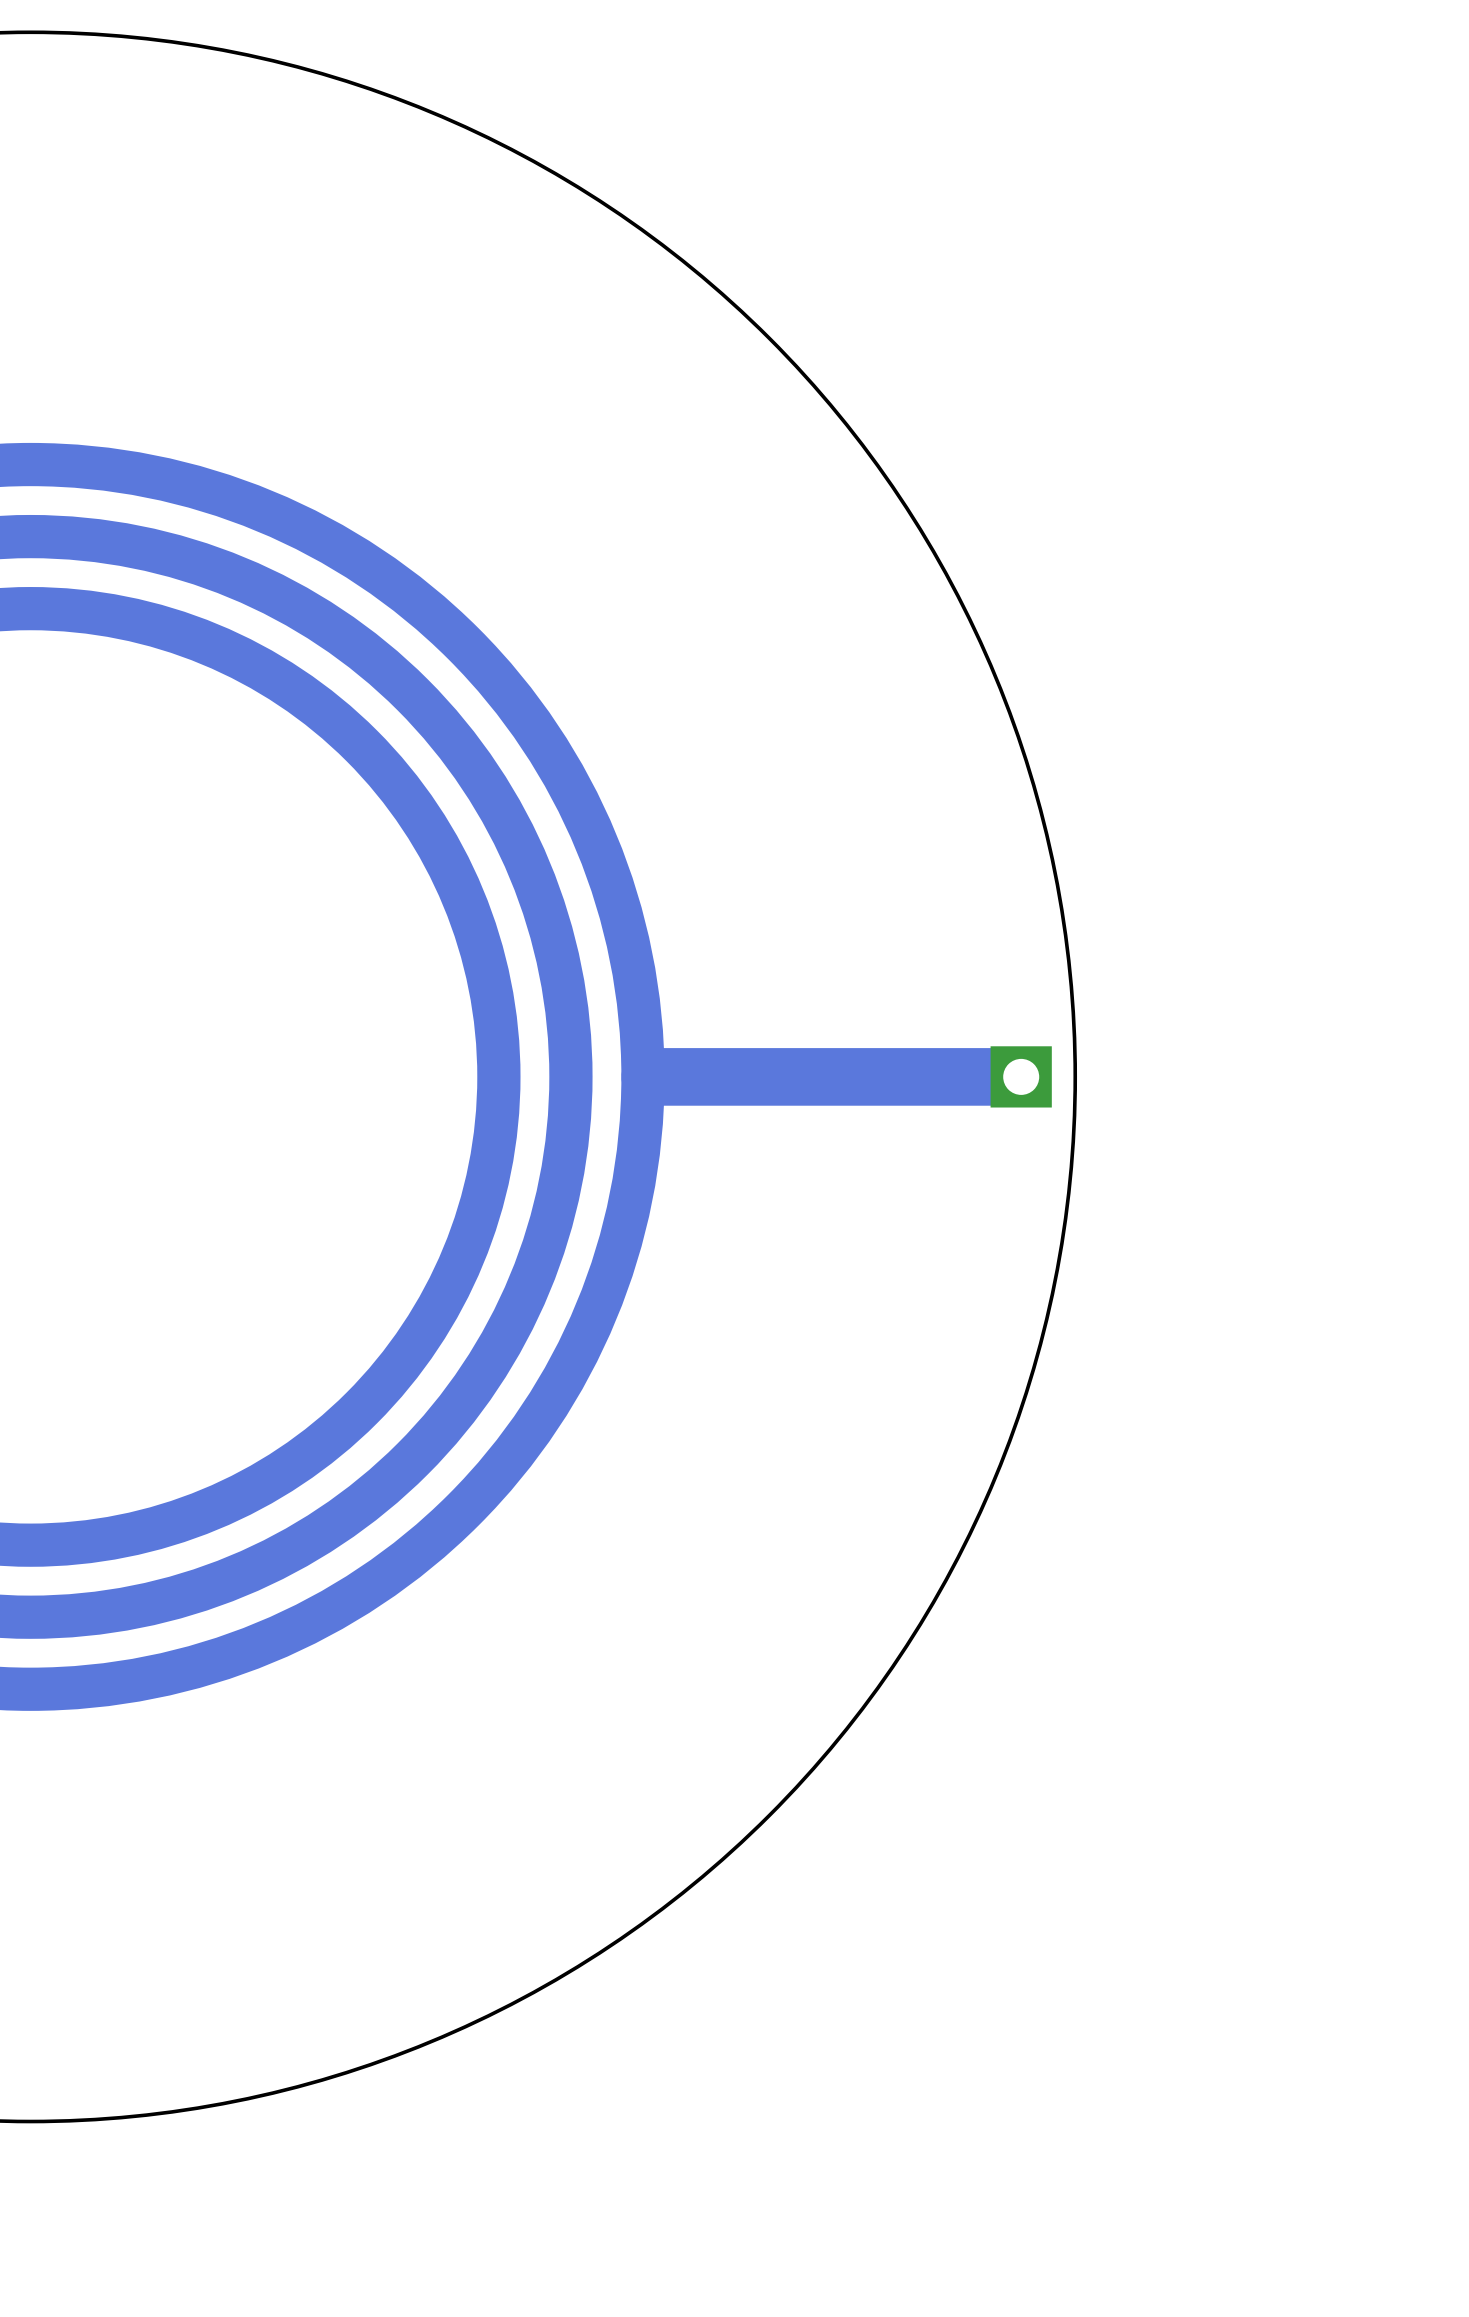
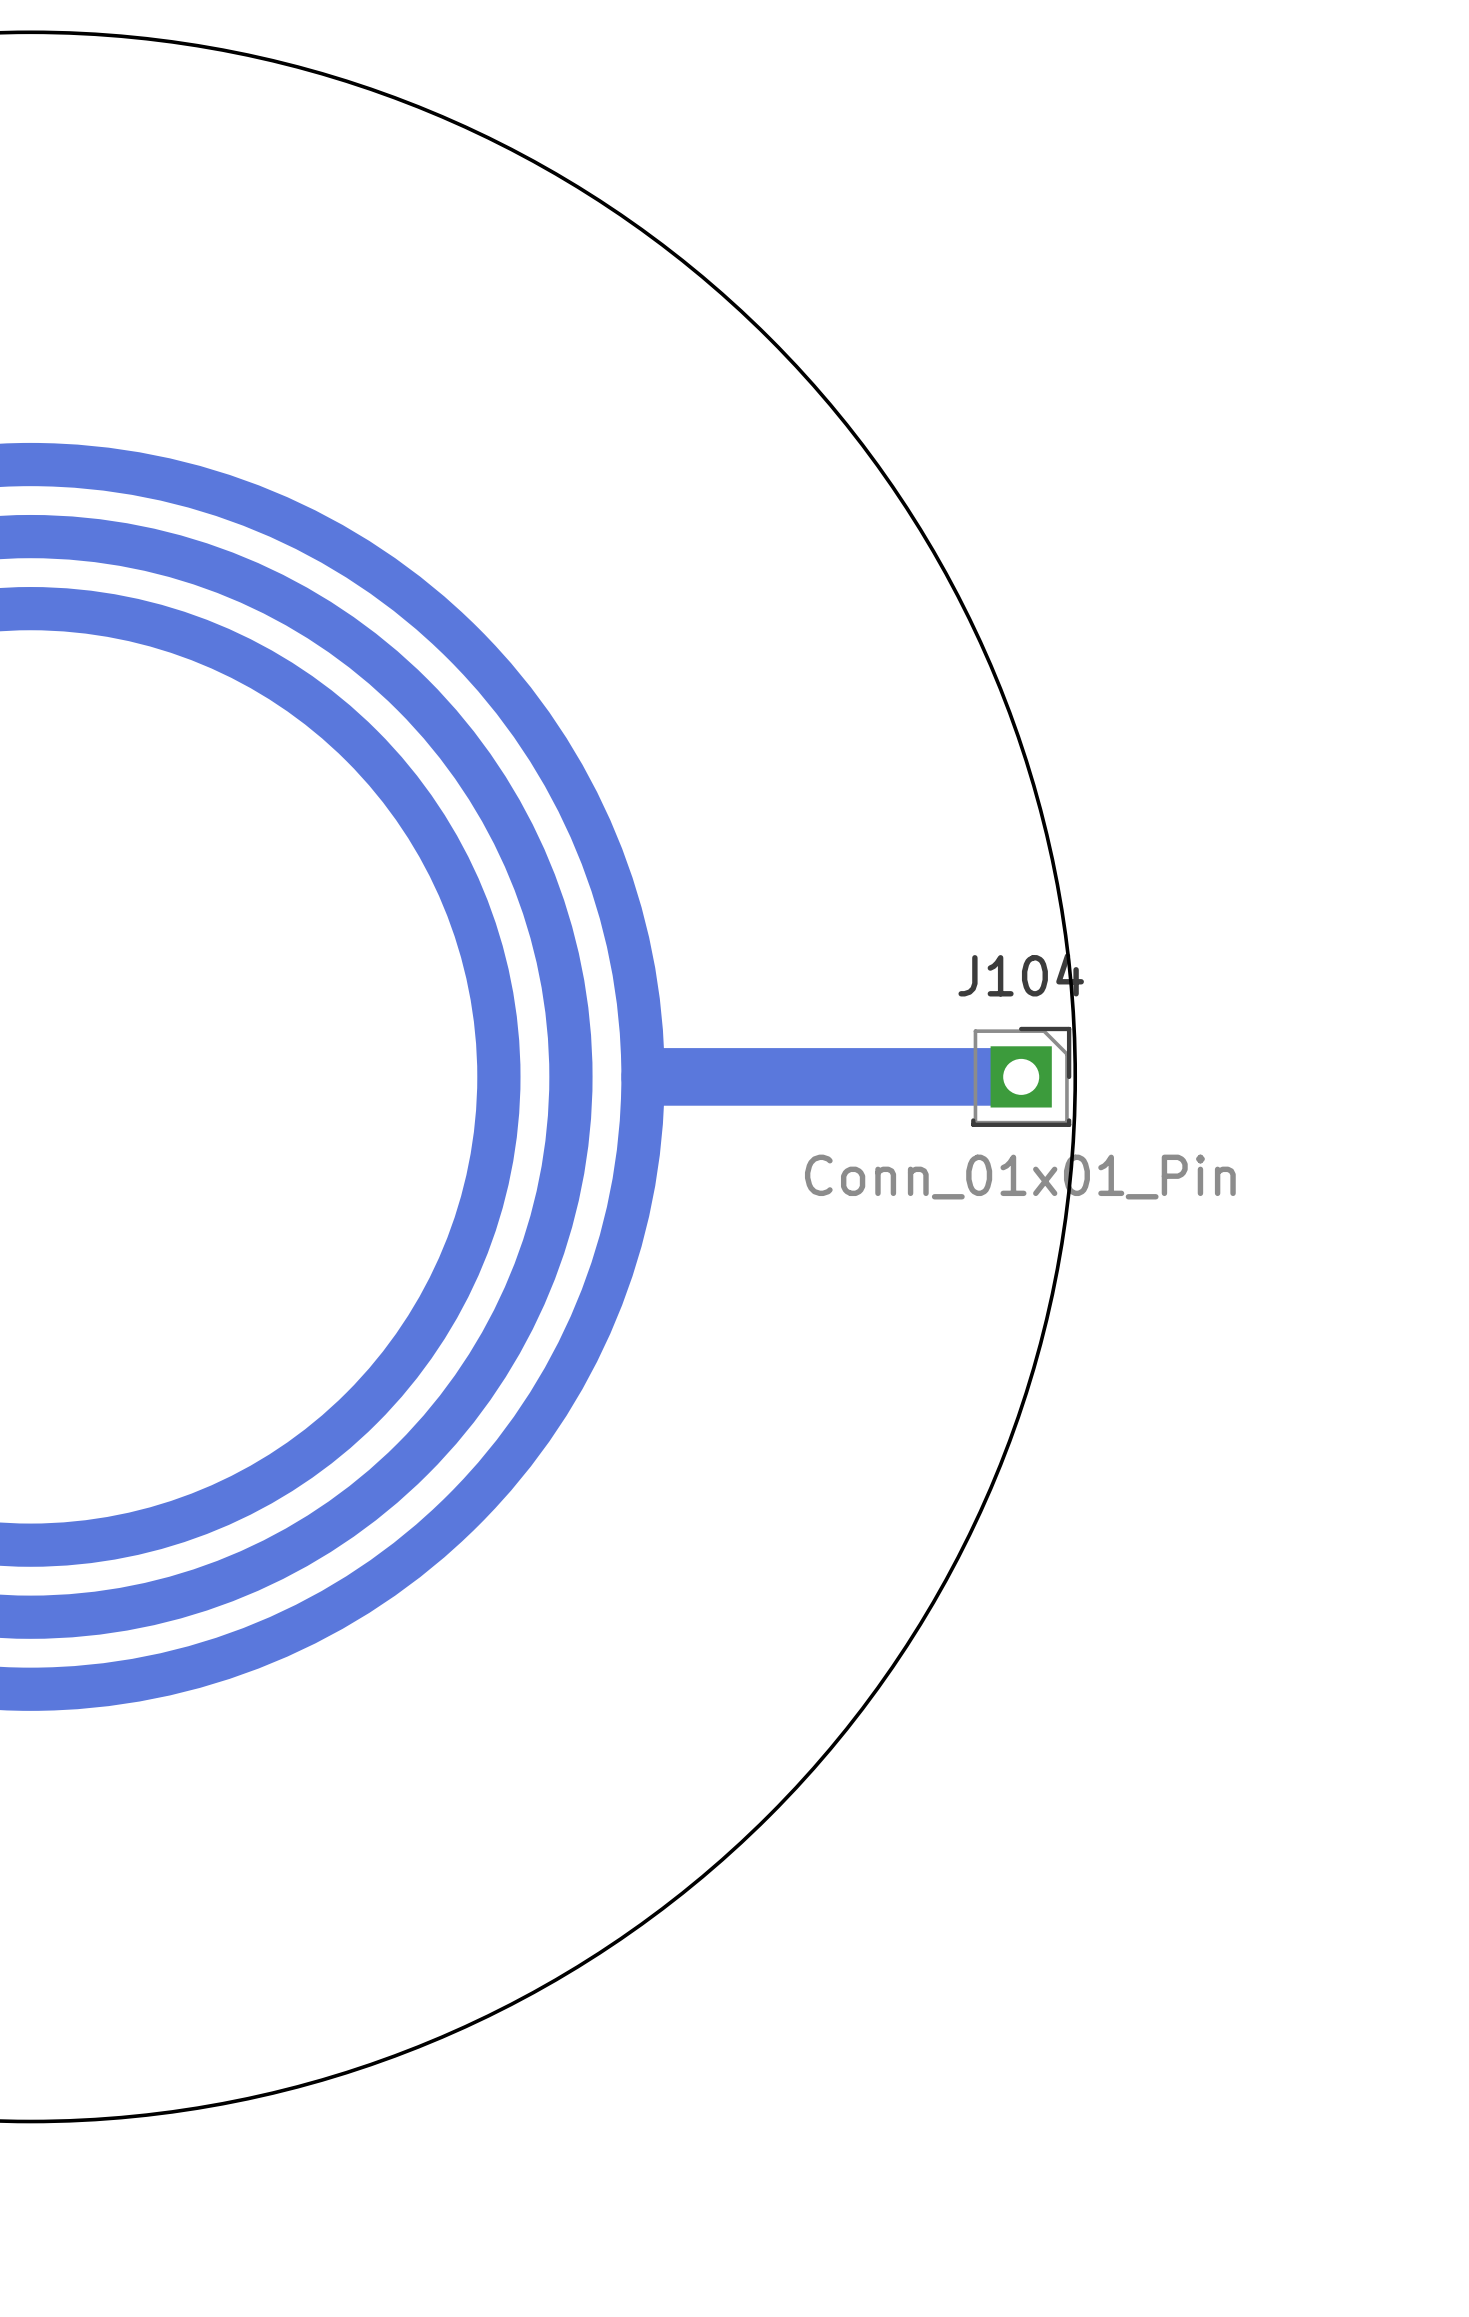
J104 side: top (1021, 1076) -> bottom (1021, 1076)

